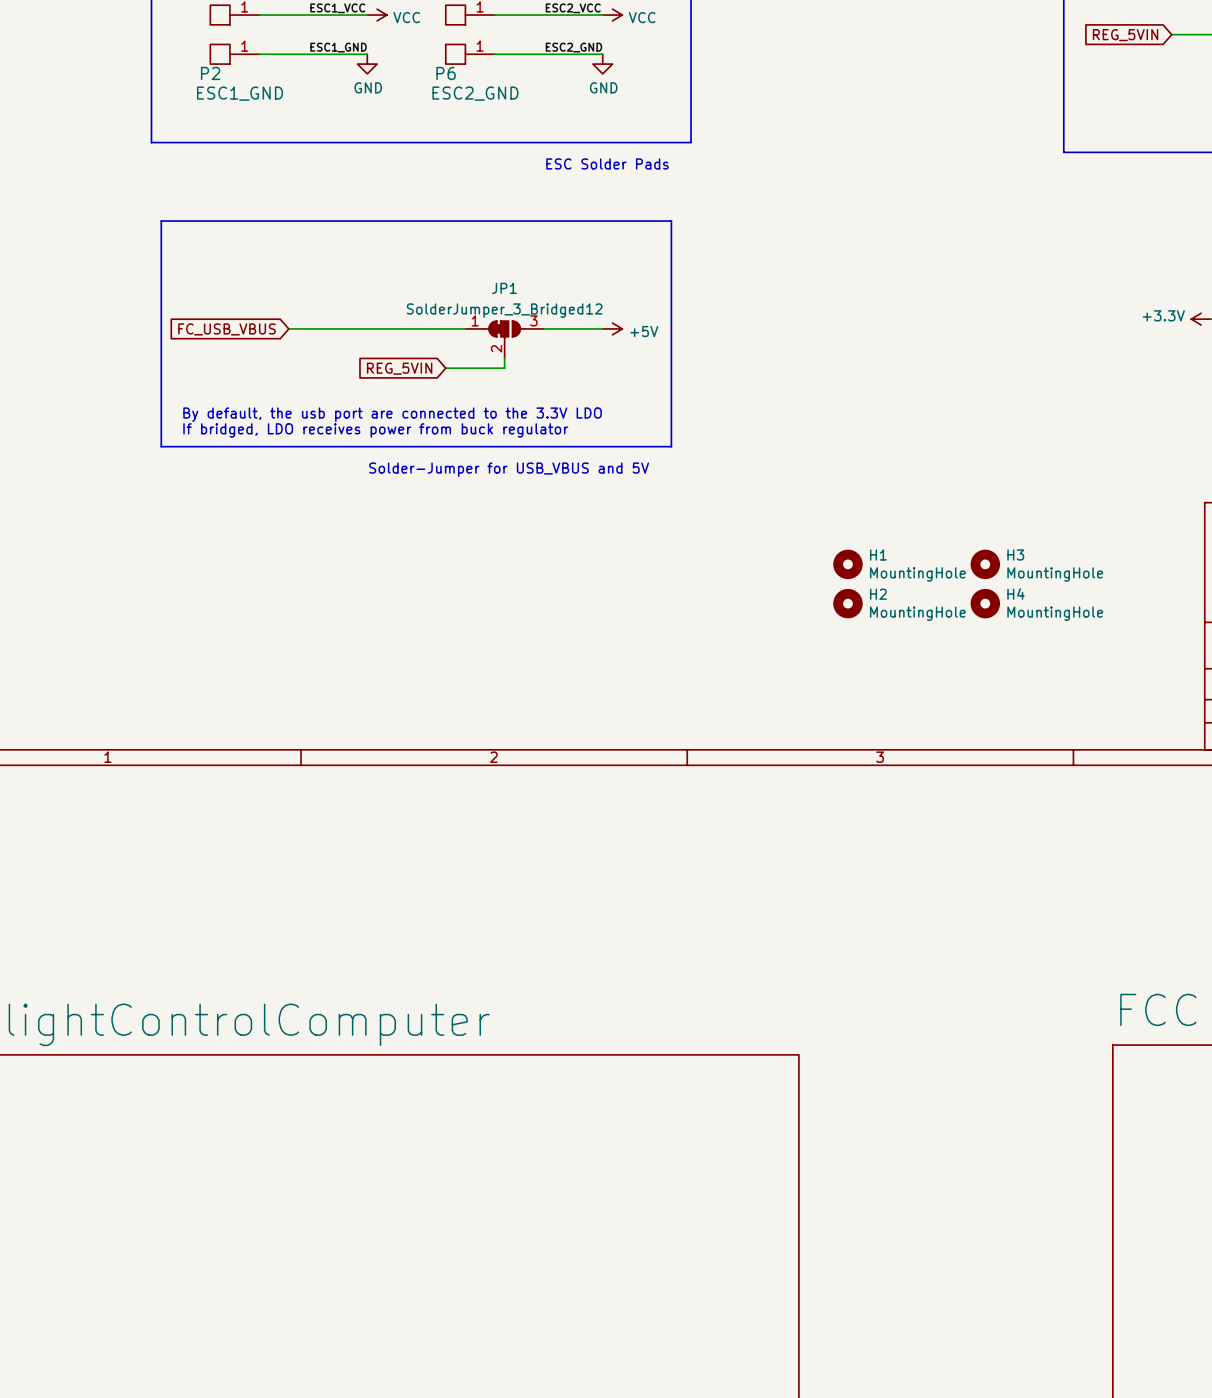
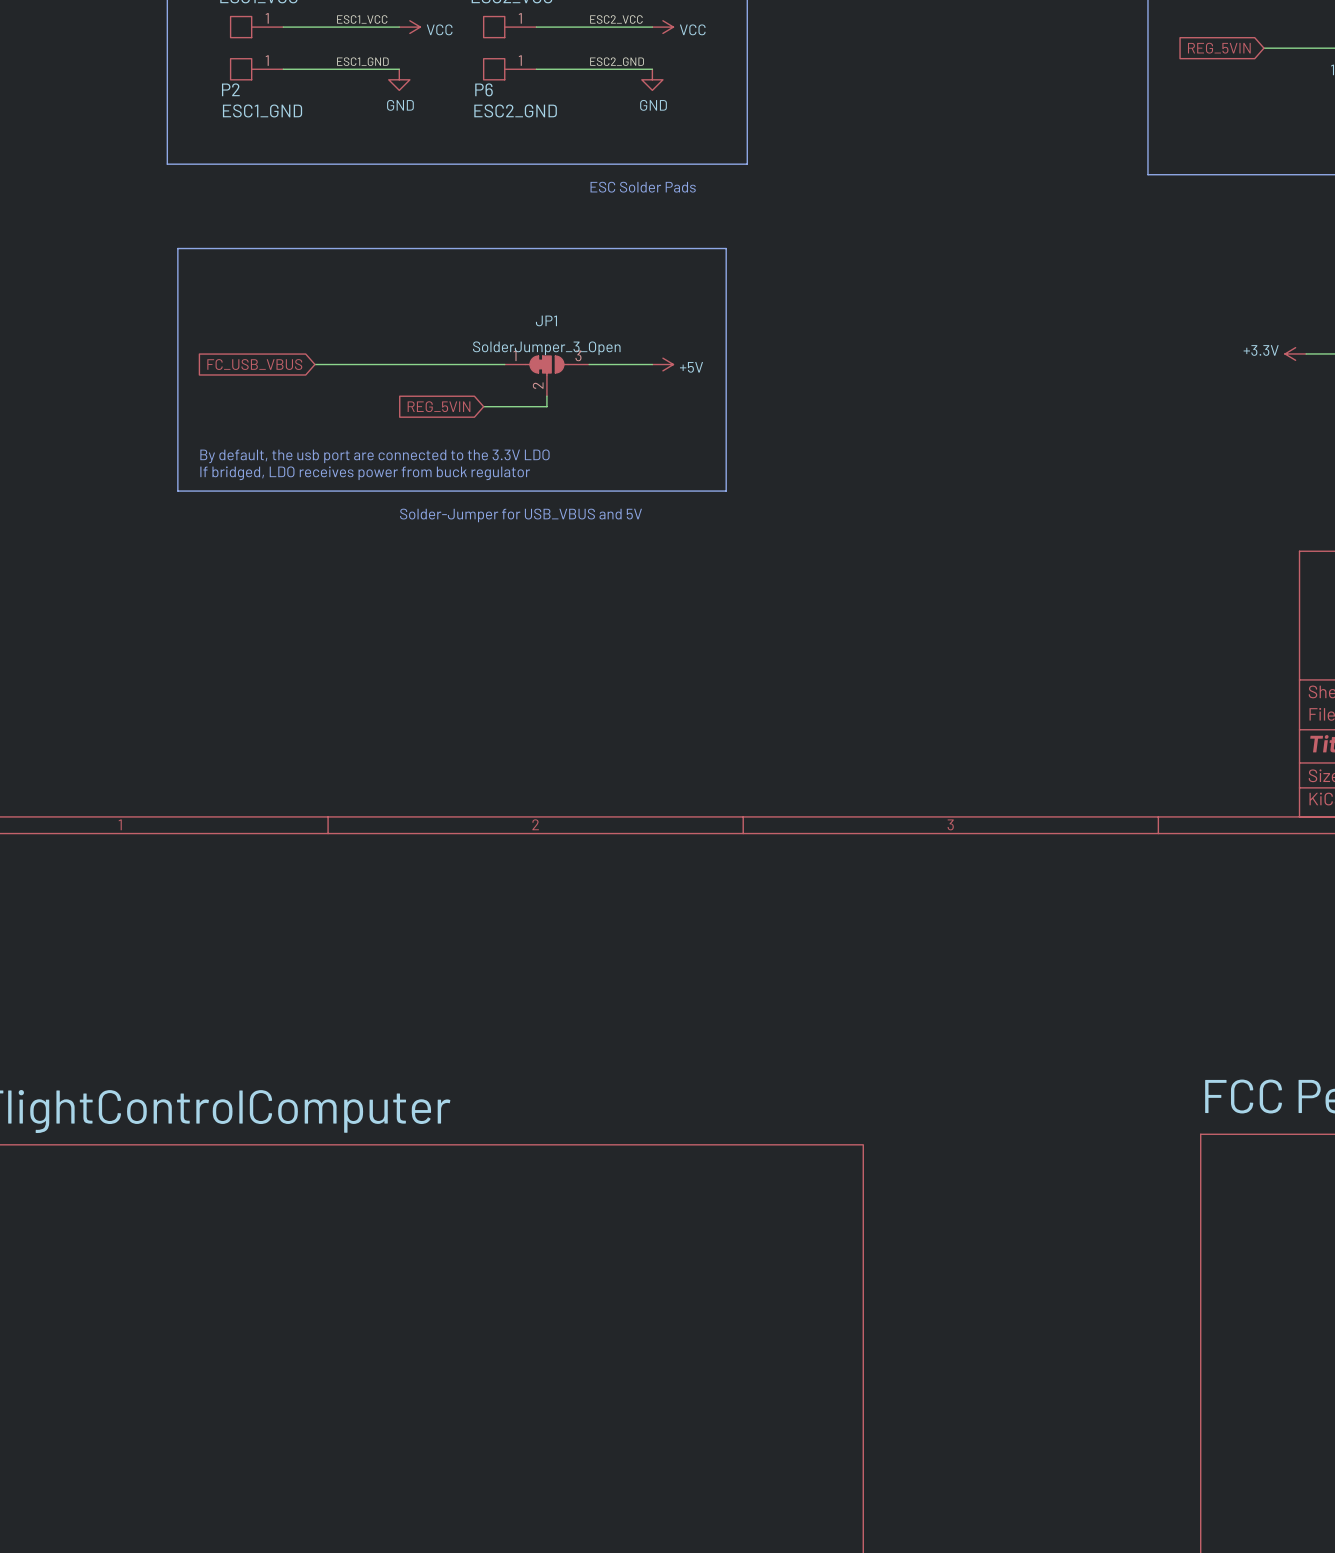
JP1 value: SolderJumper_3_Bridged12 (504, 310) -> SolderJumper_3_Open (546, 348)
H1: MountingHole (847, 564) -> none
H3: MountingHole (985, 564) -> none
H2: MountingHole (847, 603) -> none
H4: MountingHole (985, 603) -> none

